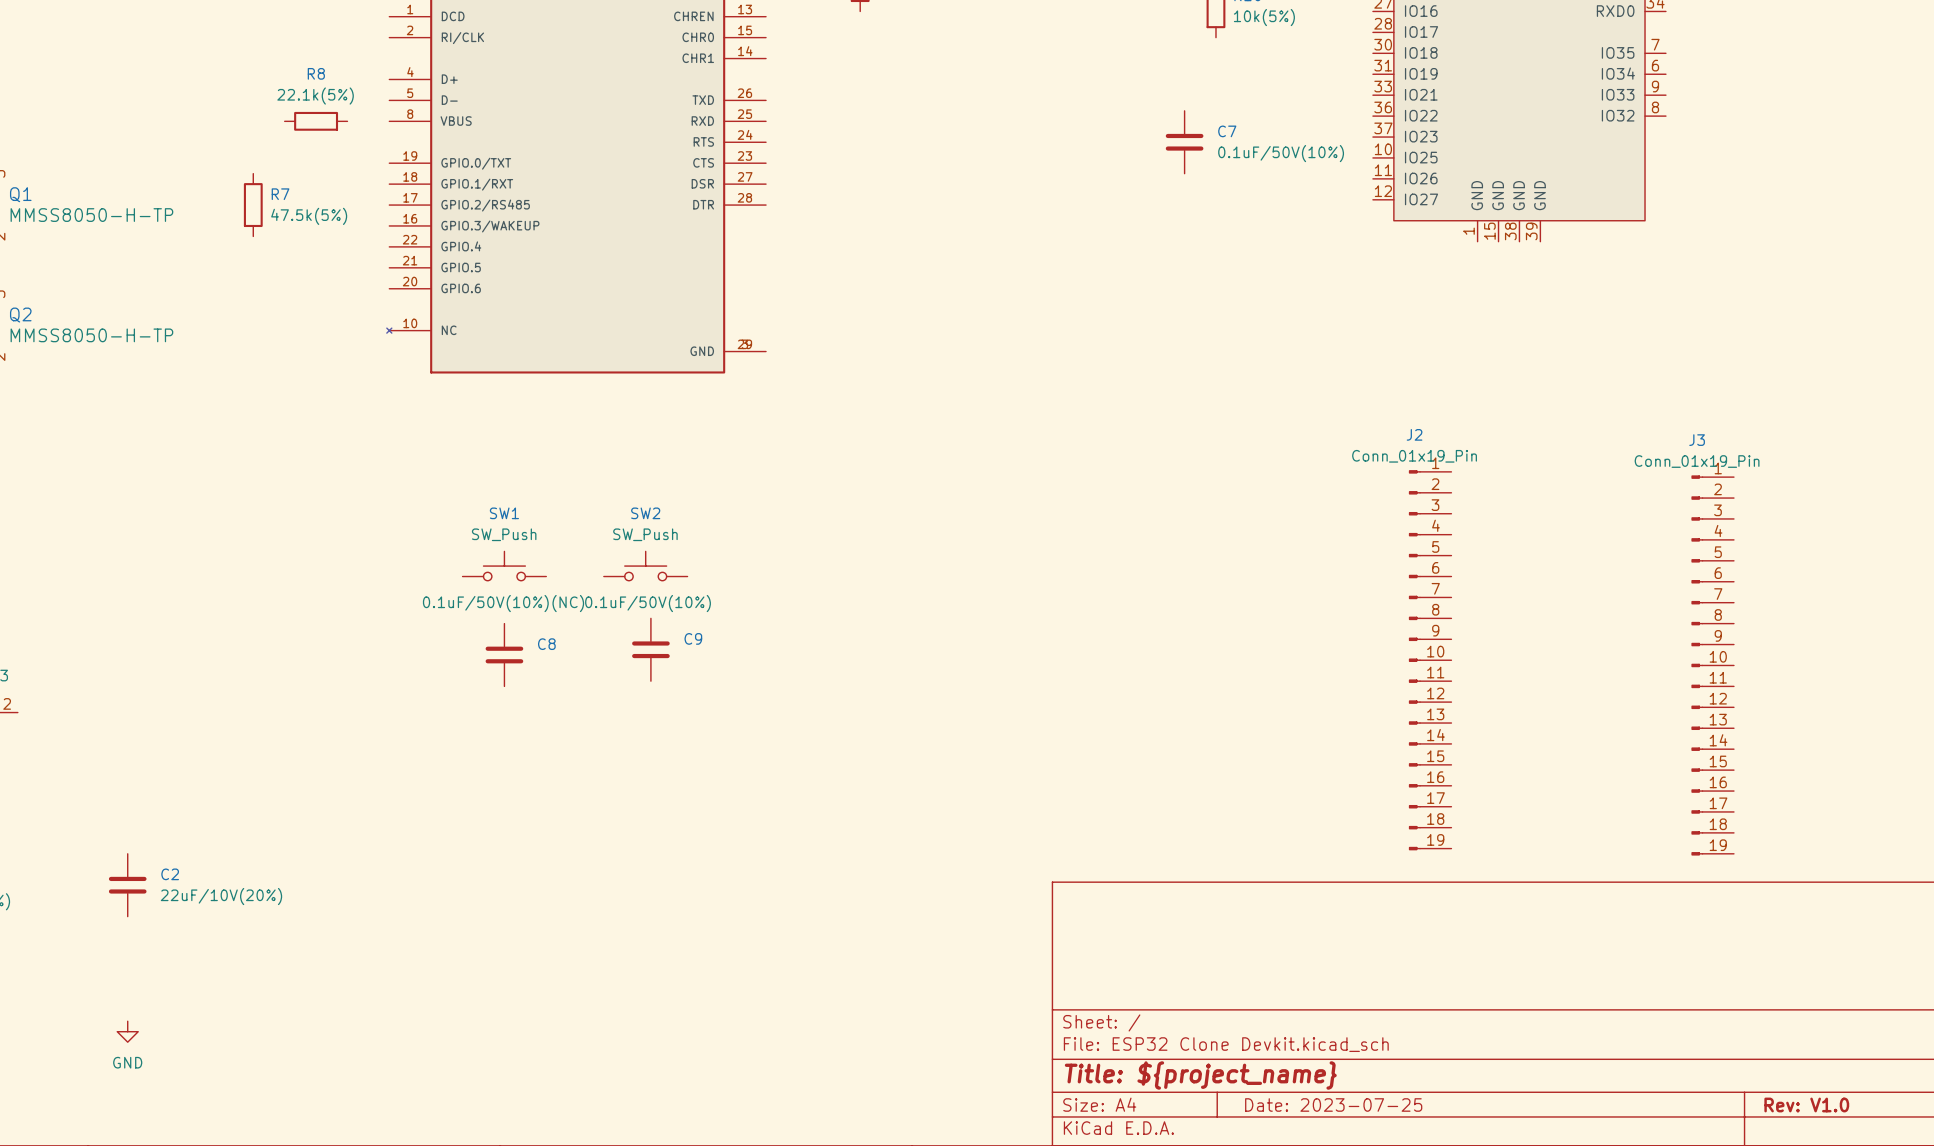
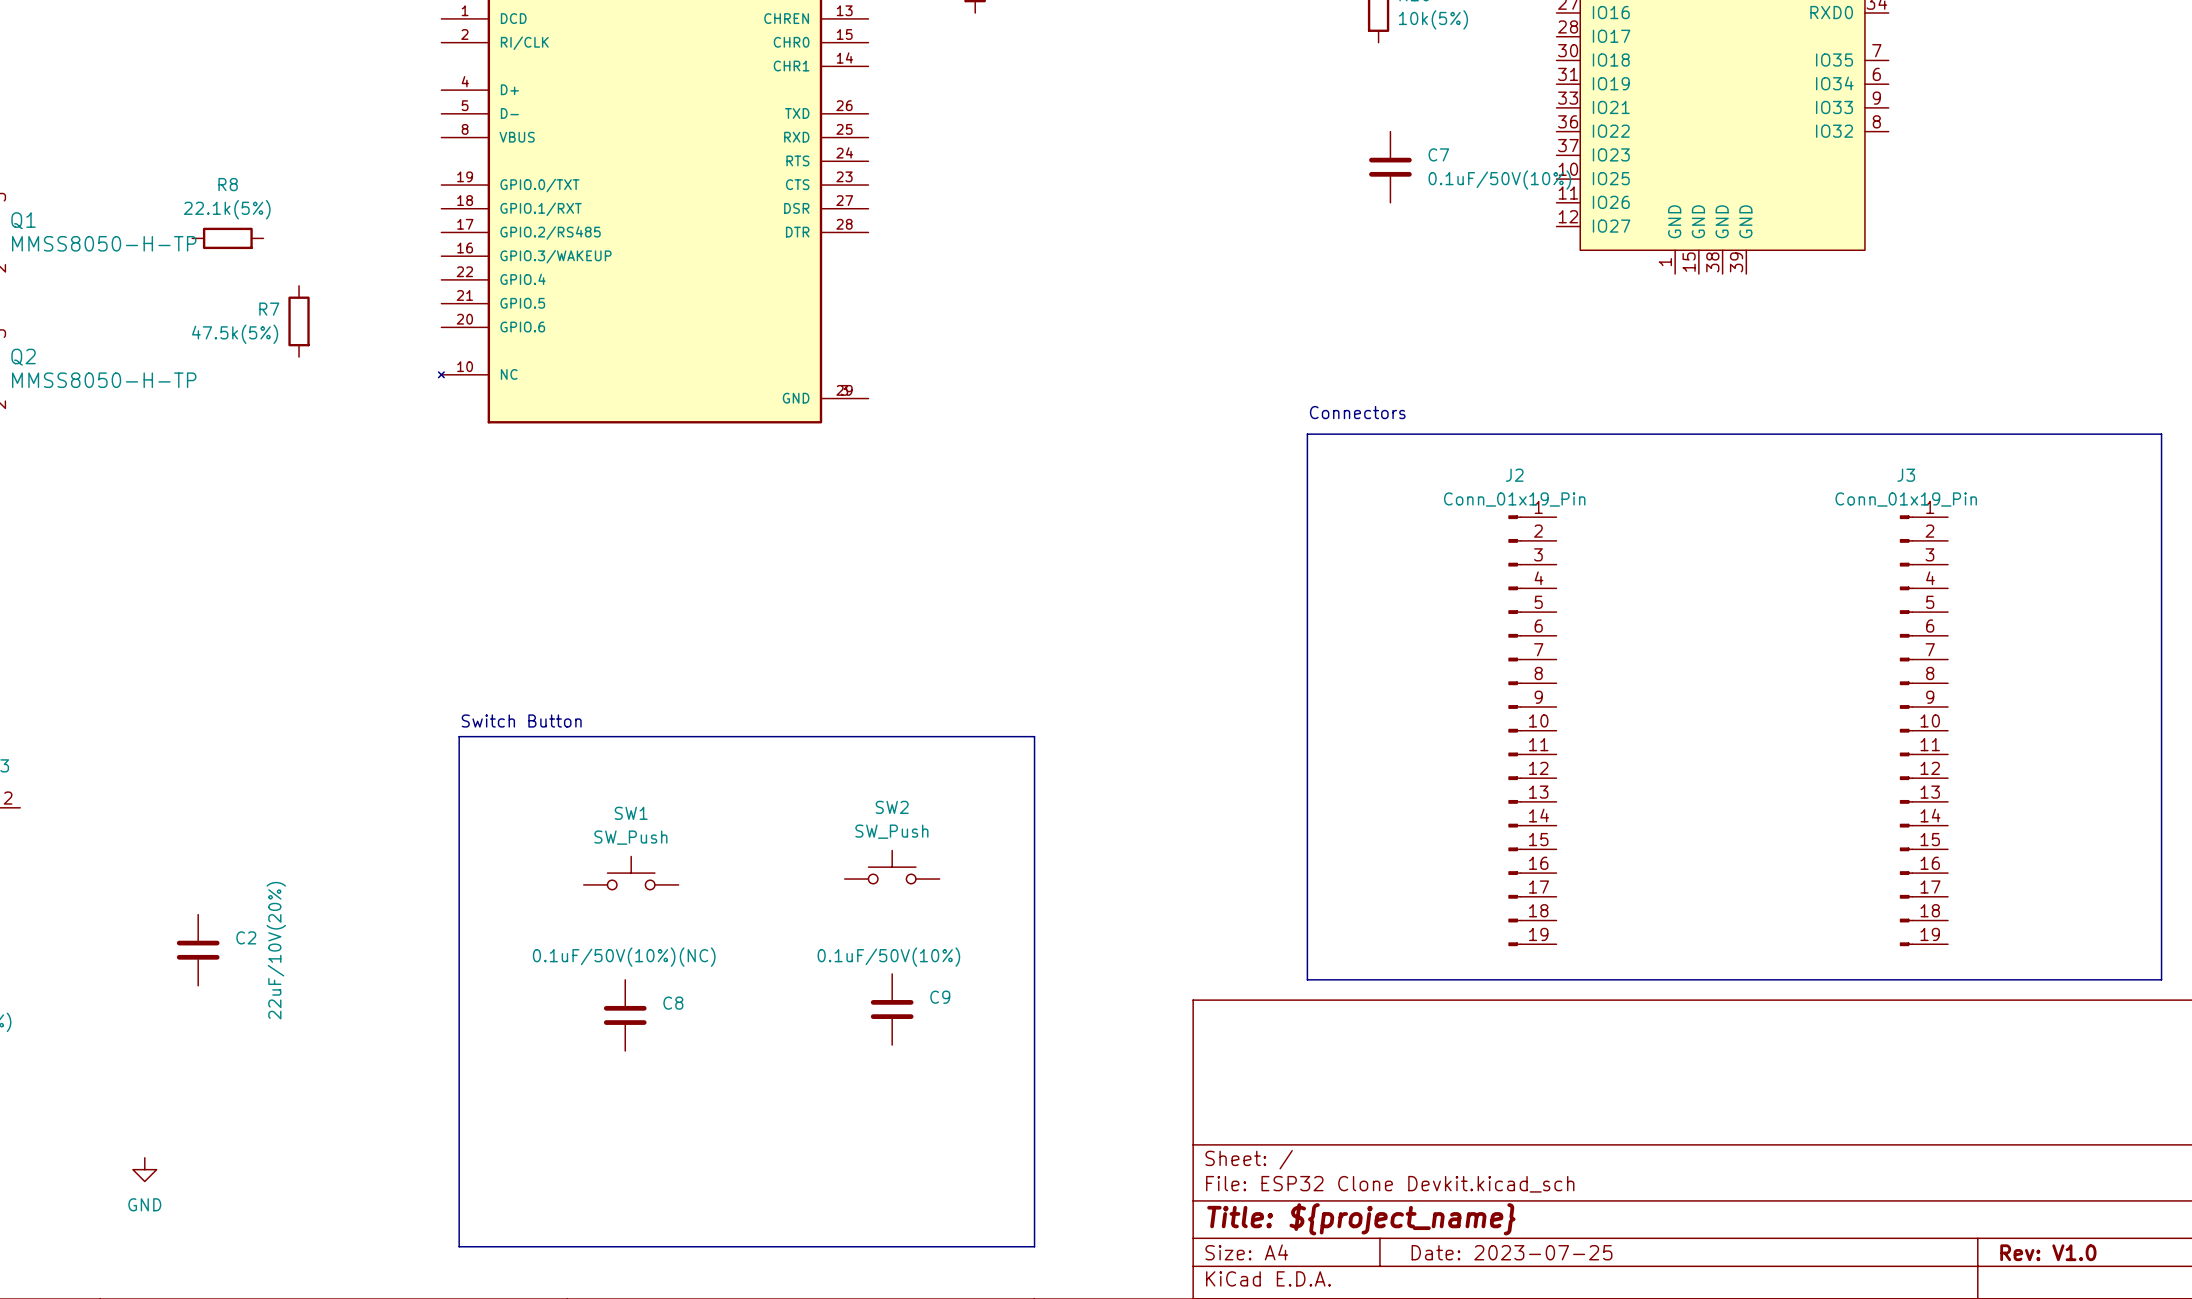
R8 position: (316, 121) -> (227, 238)
C7 position: (1184, 142) -> (1390, 167)
R7 name position: R7 (280, 194) -> R7 (269, 309)
R7 position: (253, 205) -> (299, 321)
R7 value position: 47.5k(5%) (309, 216) -> 47.5k(5%) (235, 334)
text: none -> Connectors (1357, 412)
line: none -> (1307, 434) (2161, 434) (2161, 979) (1307, 979) (1307, 434)
SW1 position: (504, 566) -> (631, 873)
SW2 position: (645, 566) -> (892, 867)
text: none -> Switch Button (521, 721)
line: none -> (459, 736) (1034, 736) (1034, 1246) (459, 1246) (459, 736)
C9 position: (650, 649) -> (892, 1009)
C8 position: (504, 655) -> (625, 1015)
J2 position: (1430, 660) -> (1532, 730)
J3 position: (1712, 665) -> (1923, 730)
C2 position: (127, 885) -> (198, 950)
C2 value rotation: 0° (221, 896) -> 90° counterclockwise (276, 950)

